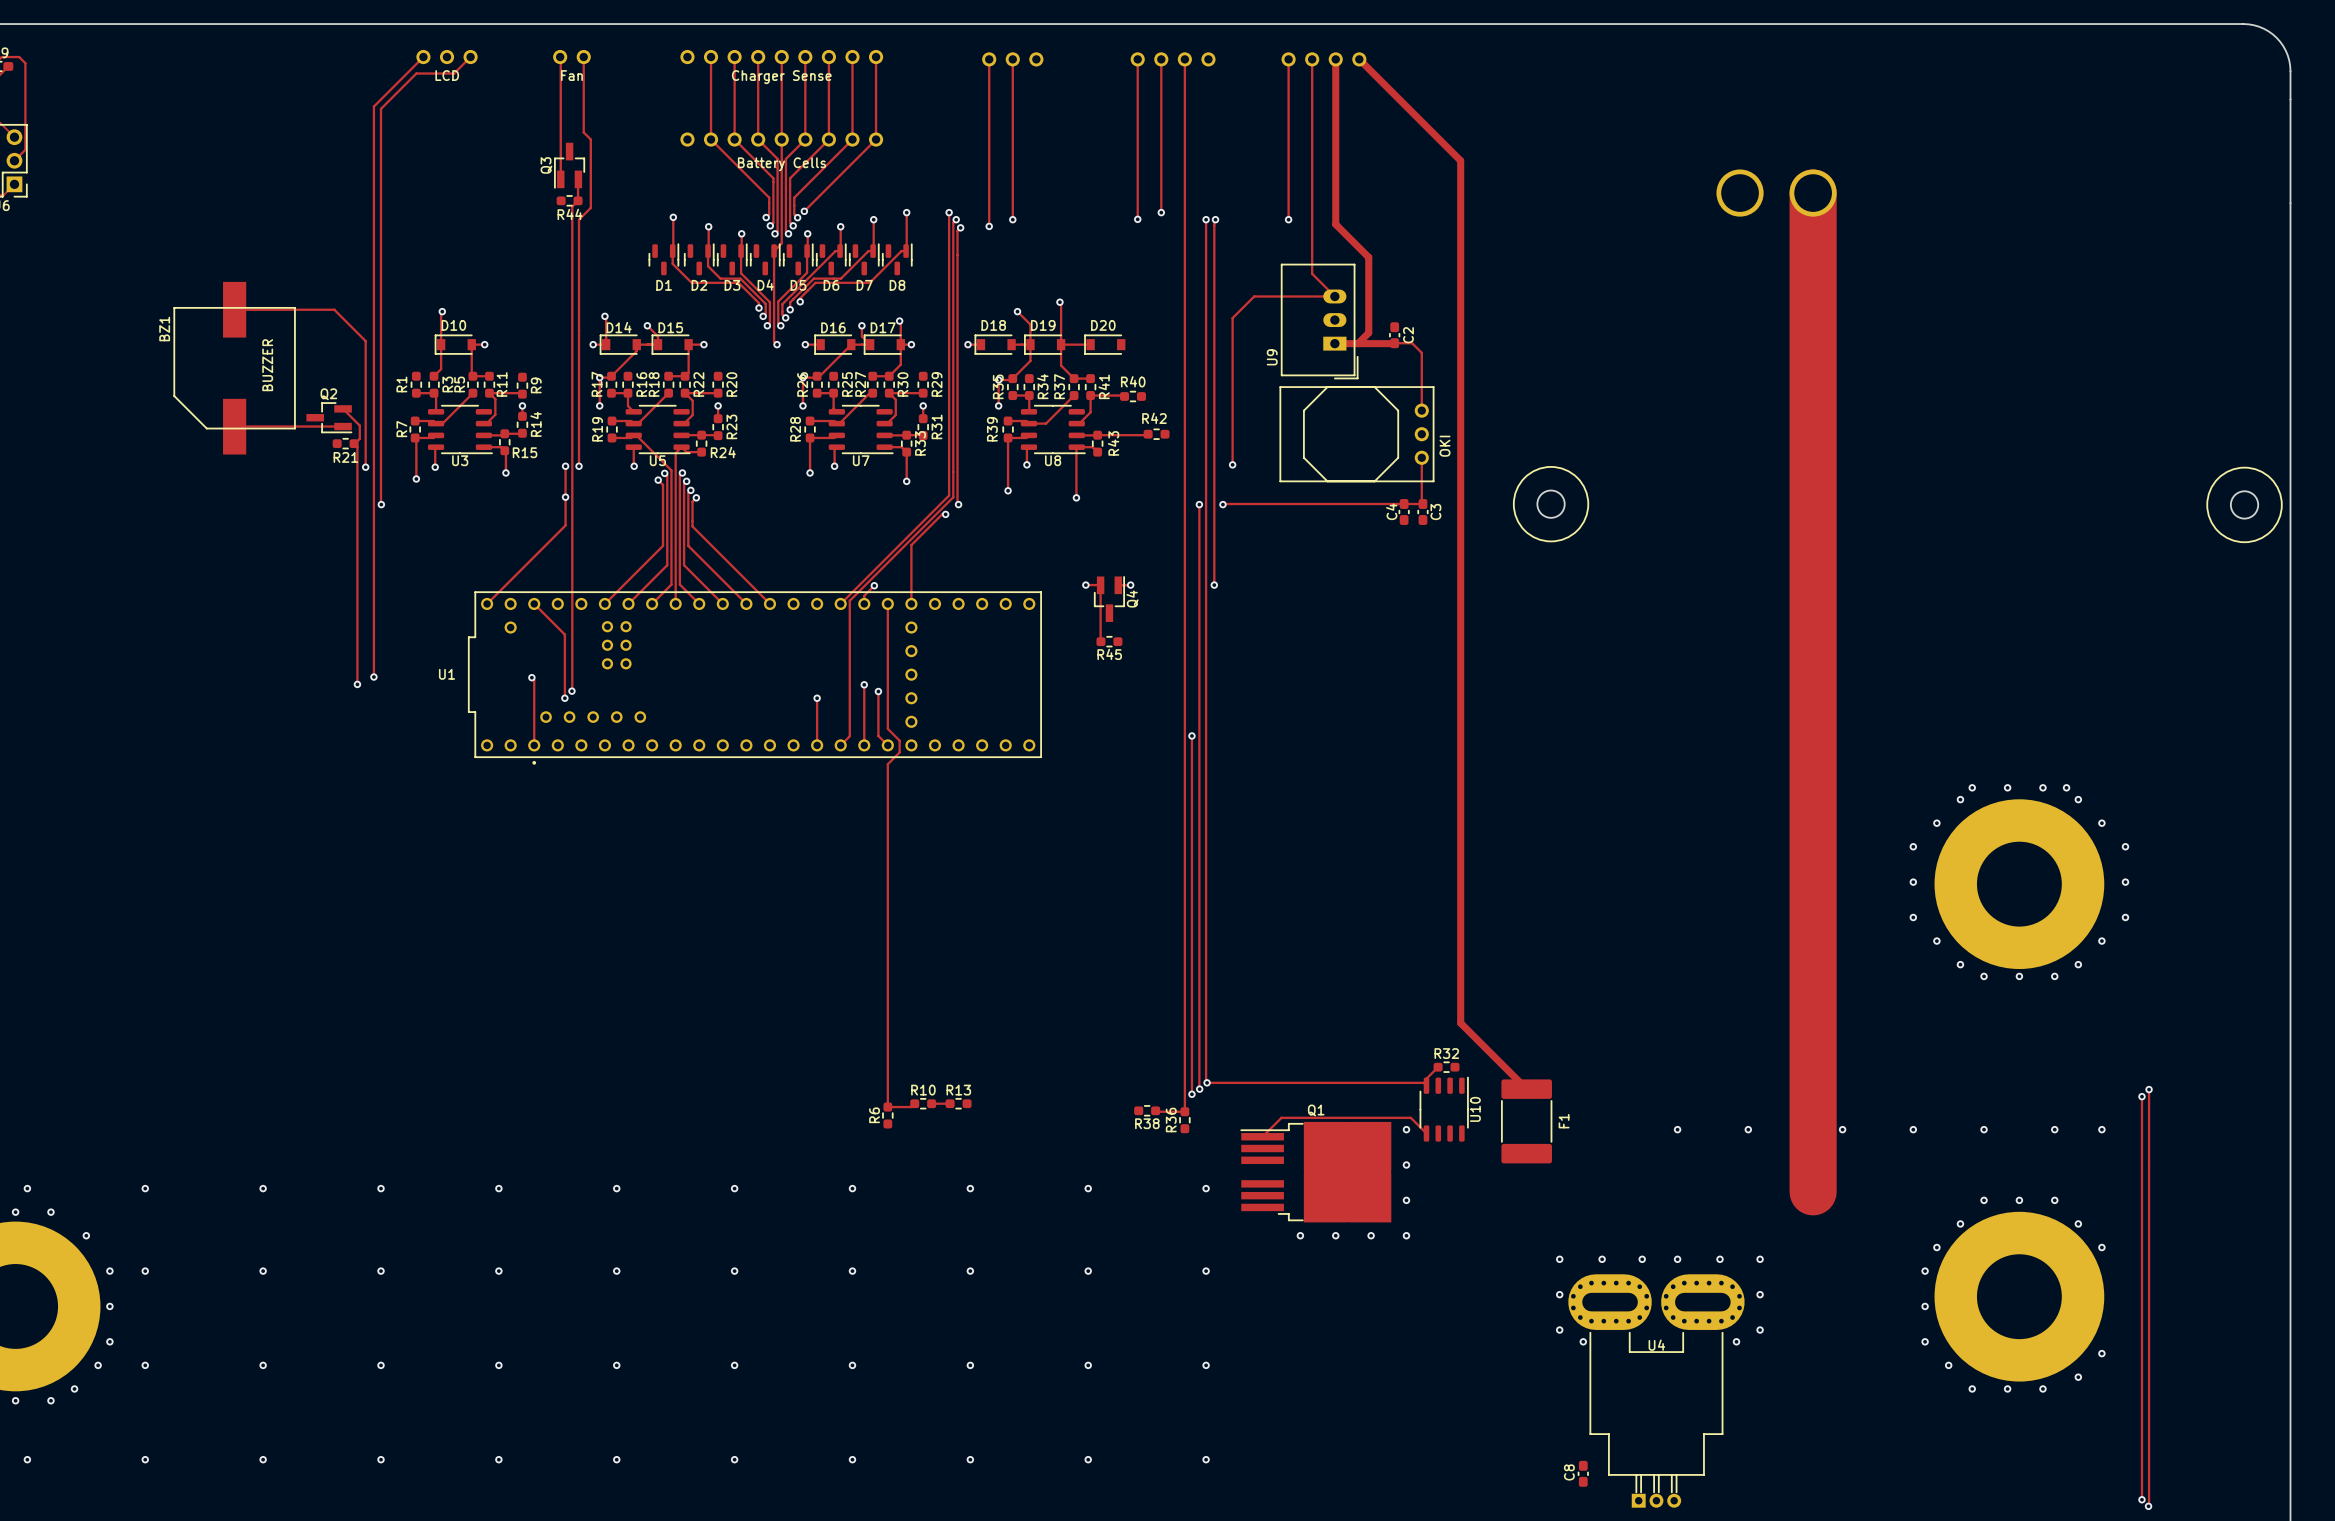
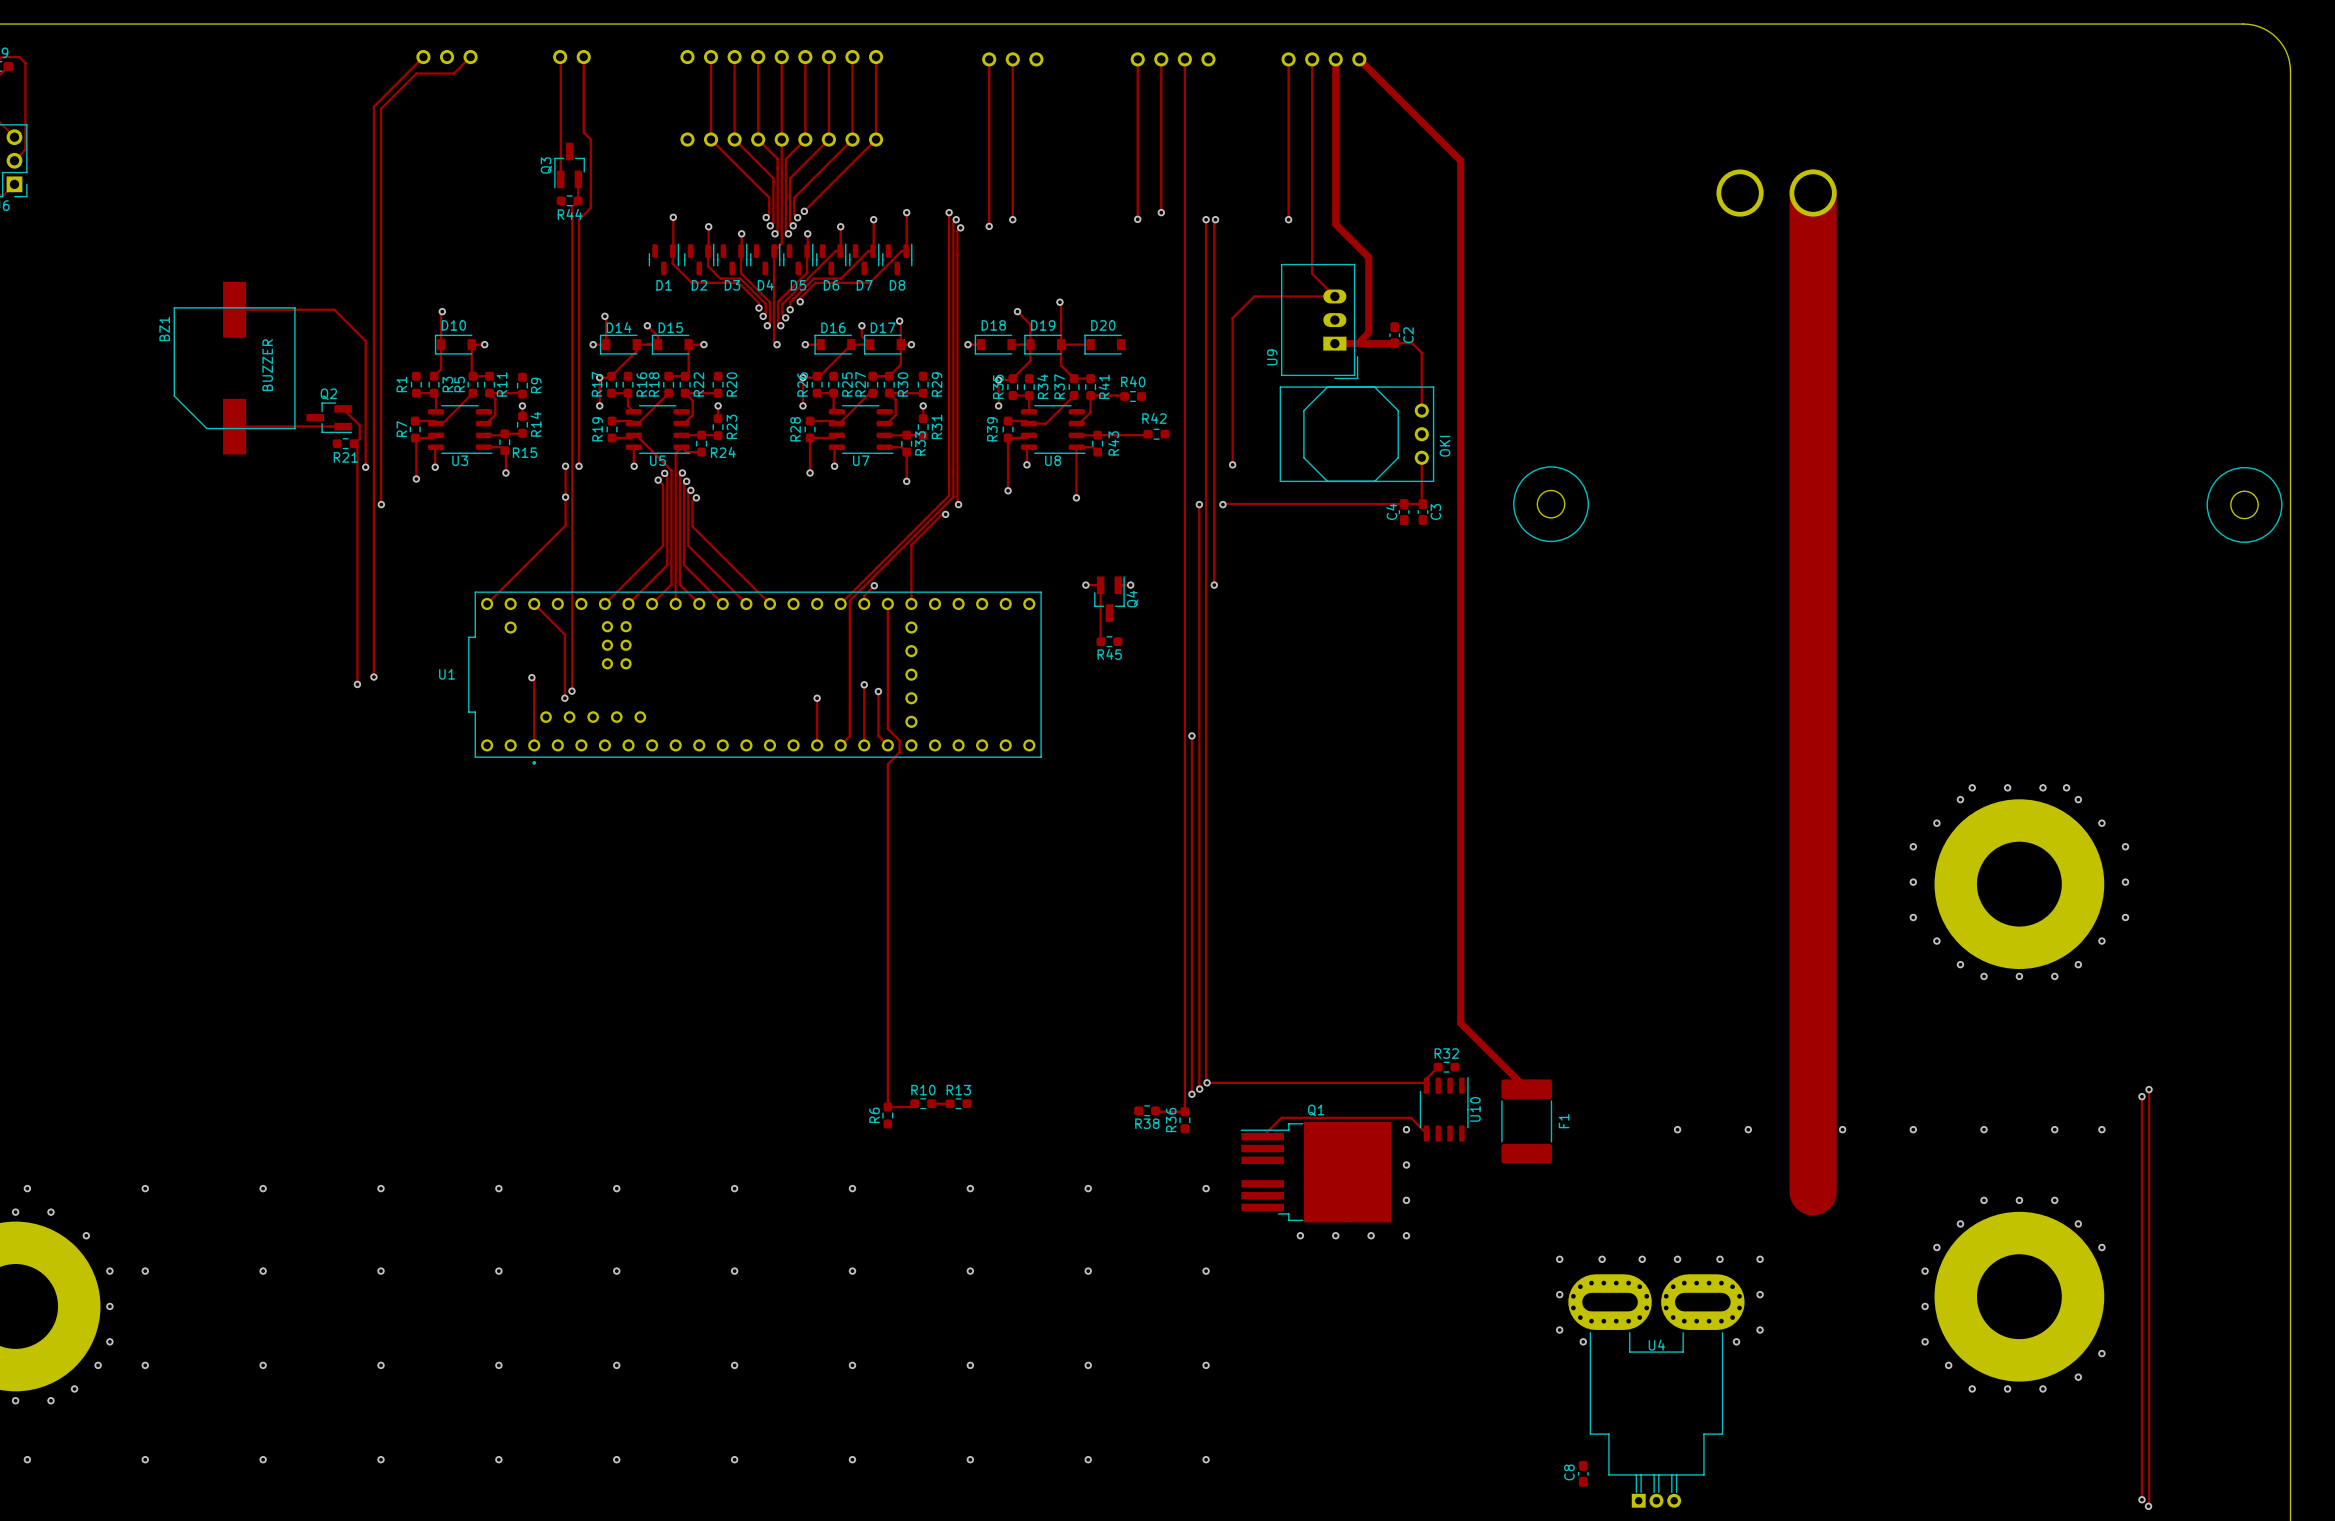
text: LCD (447, 75) -> none
text: Fan (571, 75) -> none
text: Charger Sense (781, 77) -> none
text: Battery Cells (781, 164) -> none

